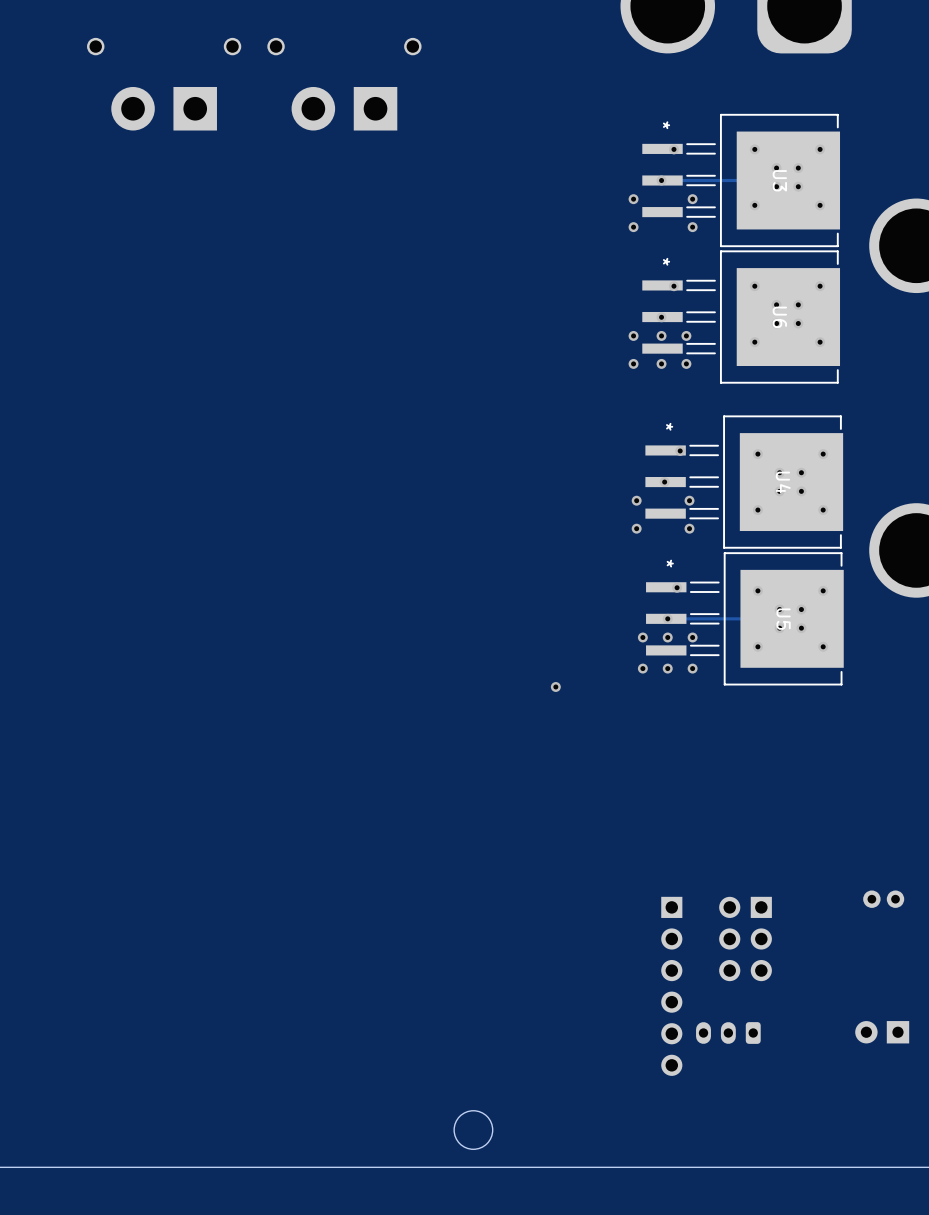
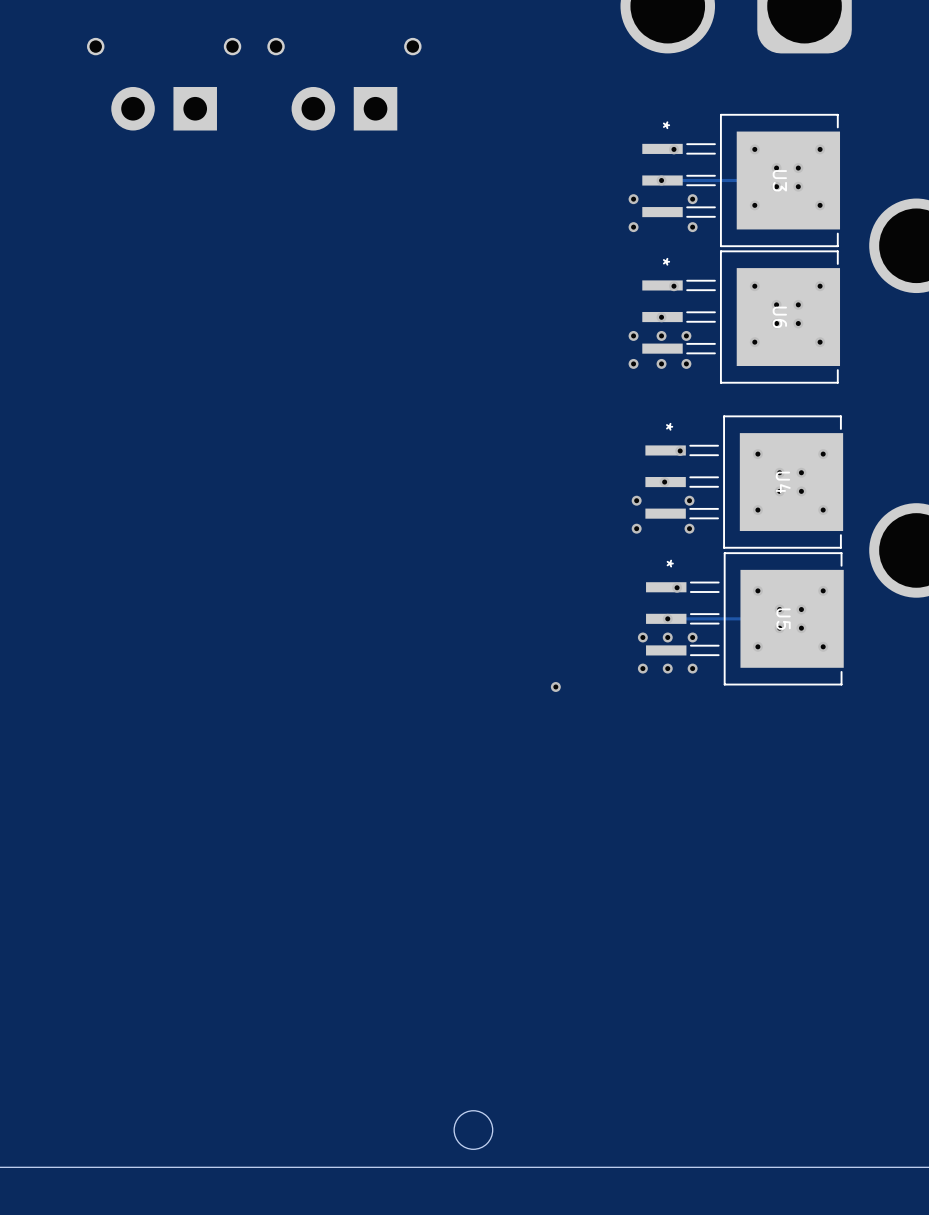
part: (883, 899) -> none
part: (745, 938) -> none
part: (671, 986) -> none
part: (728, 1032) -> none
part: (882, 1032) -> none

